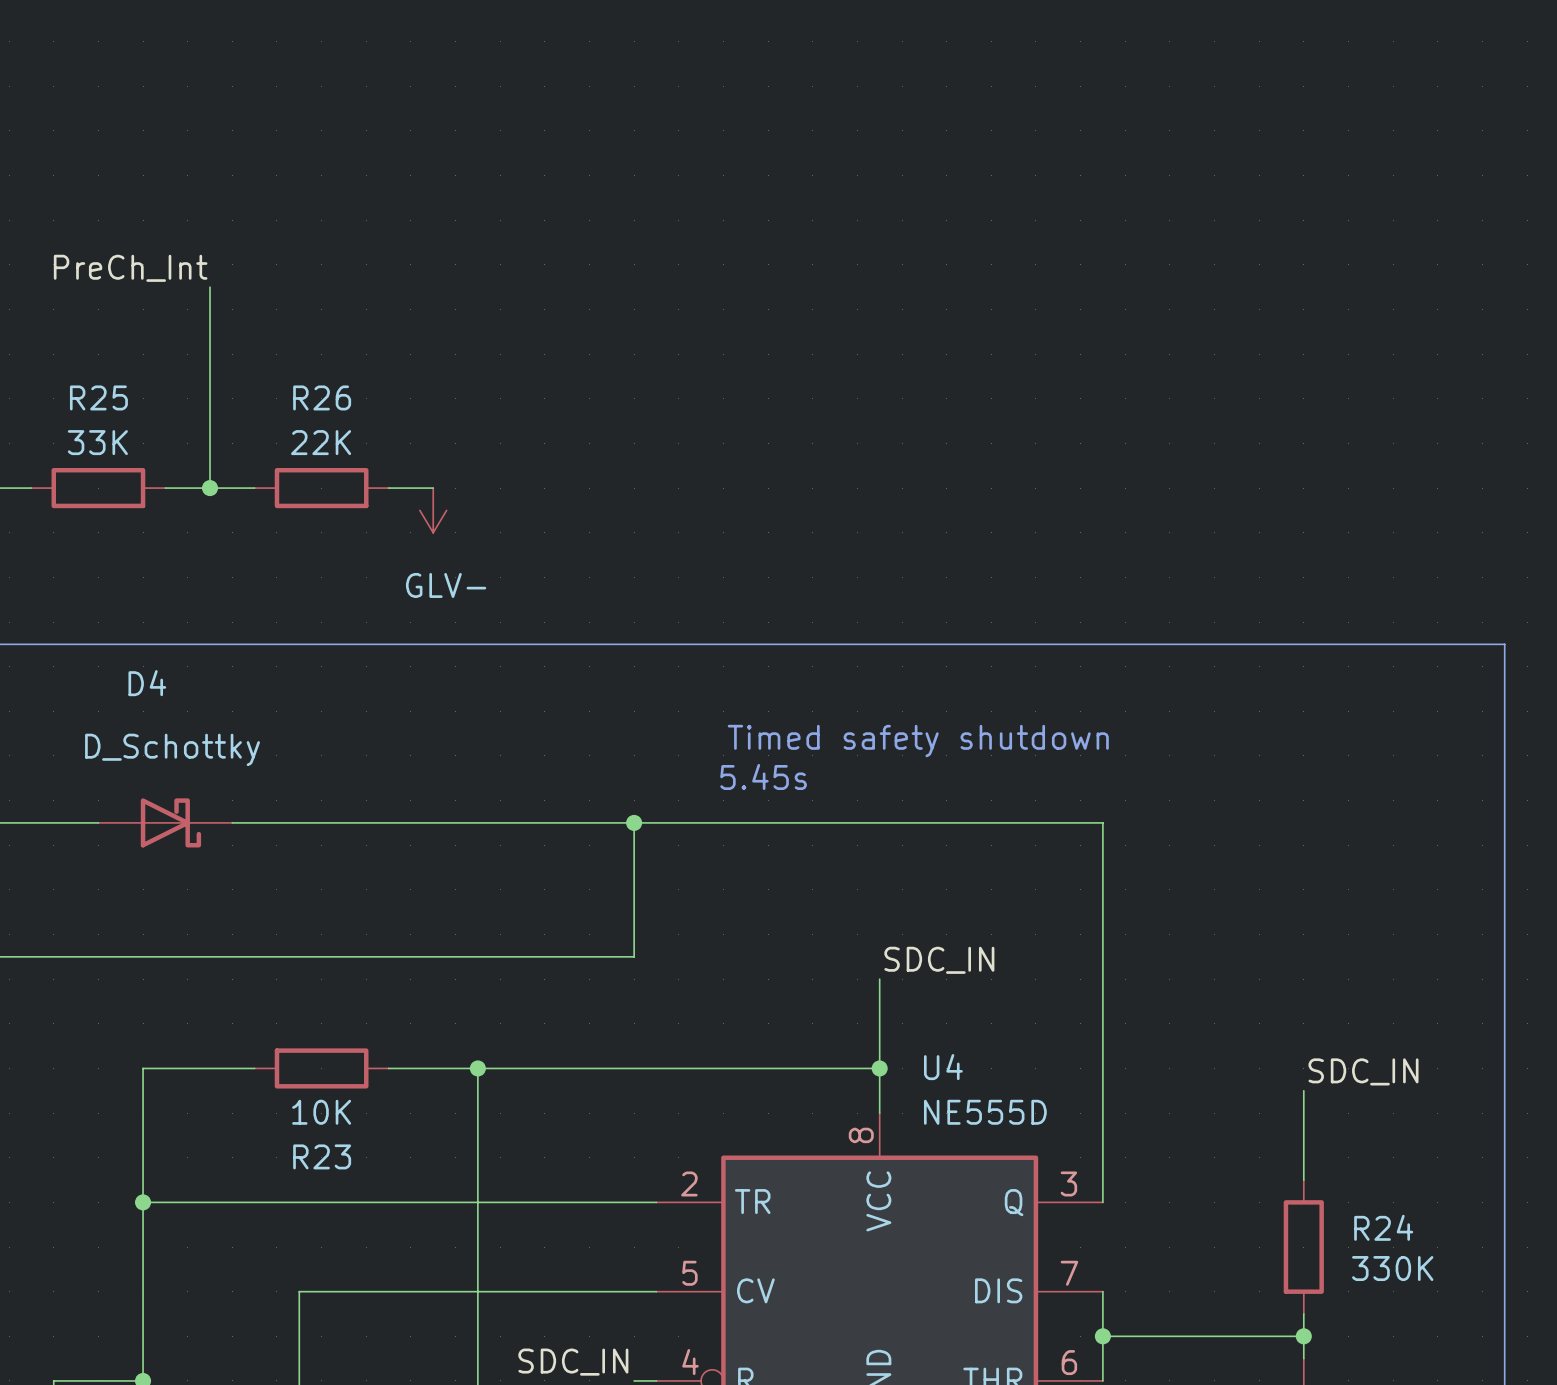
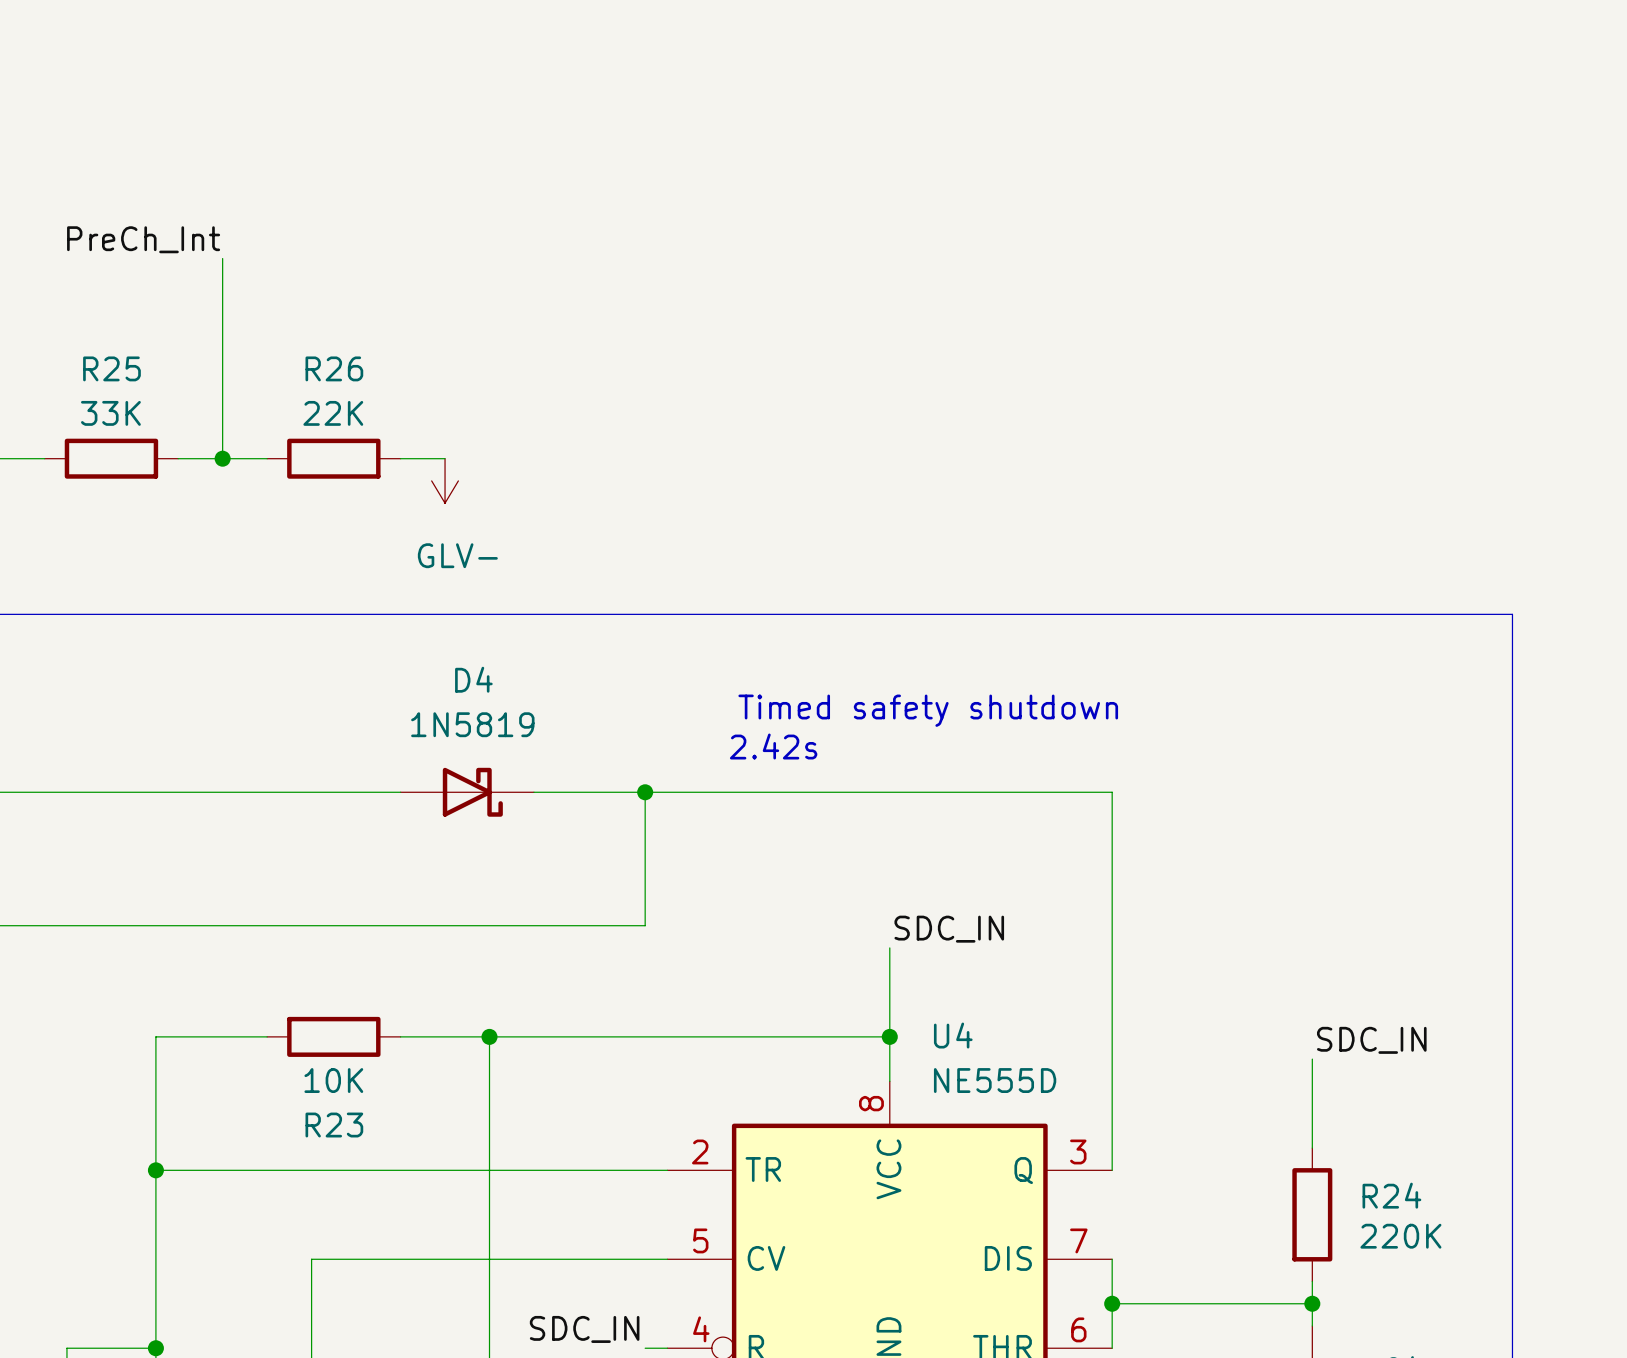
D4 name position: D4 (147, 683) -> D4 (473, 679)
D4 value: D_Schottky (172, 749) -> 1N5819 (472, 724)
text: 5.45s (763, 776) -> 2.42s (773, 746)
D4 position: (165, 822) -> (467, 792)
R24 value: 330K (1392, 1268) -> 220K (1400, 1236)

